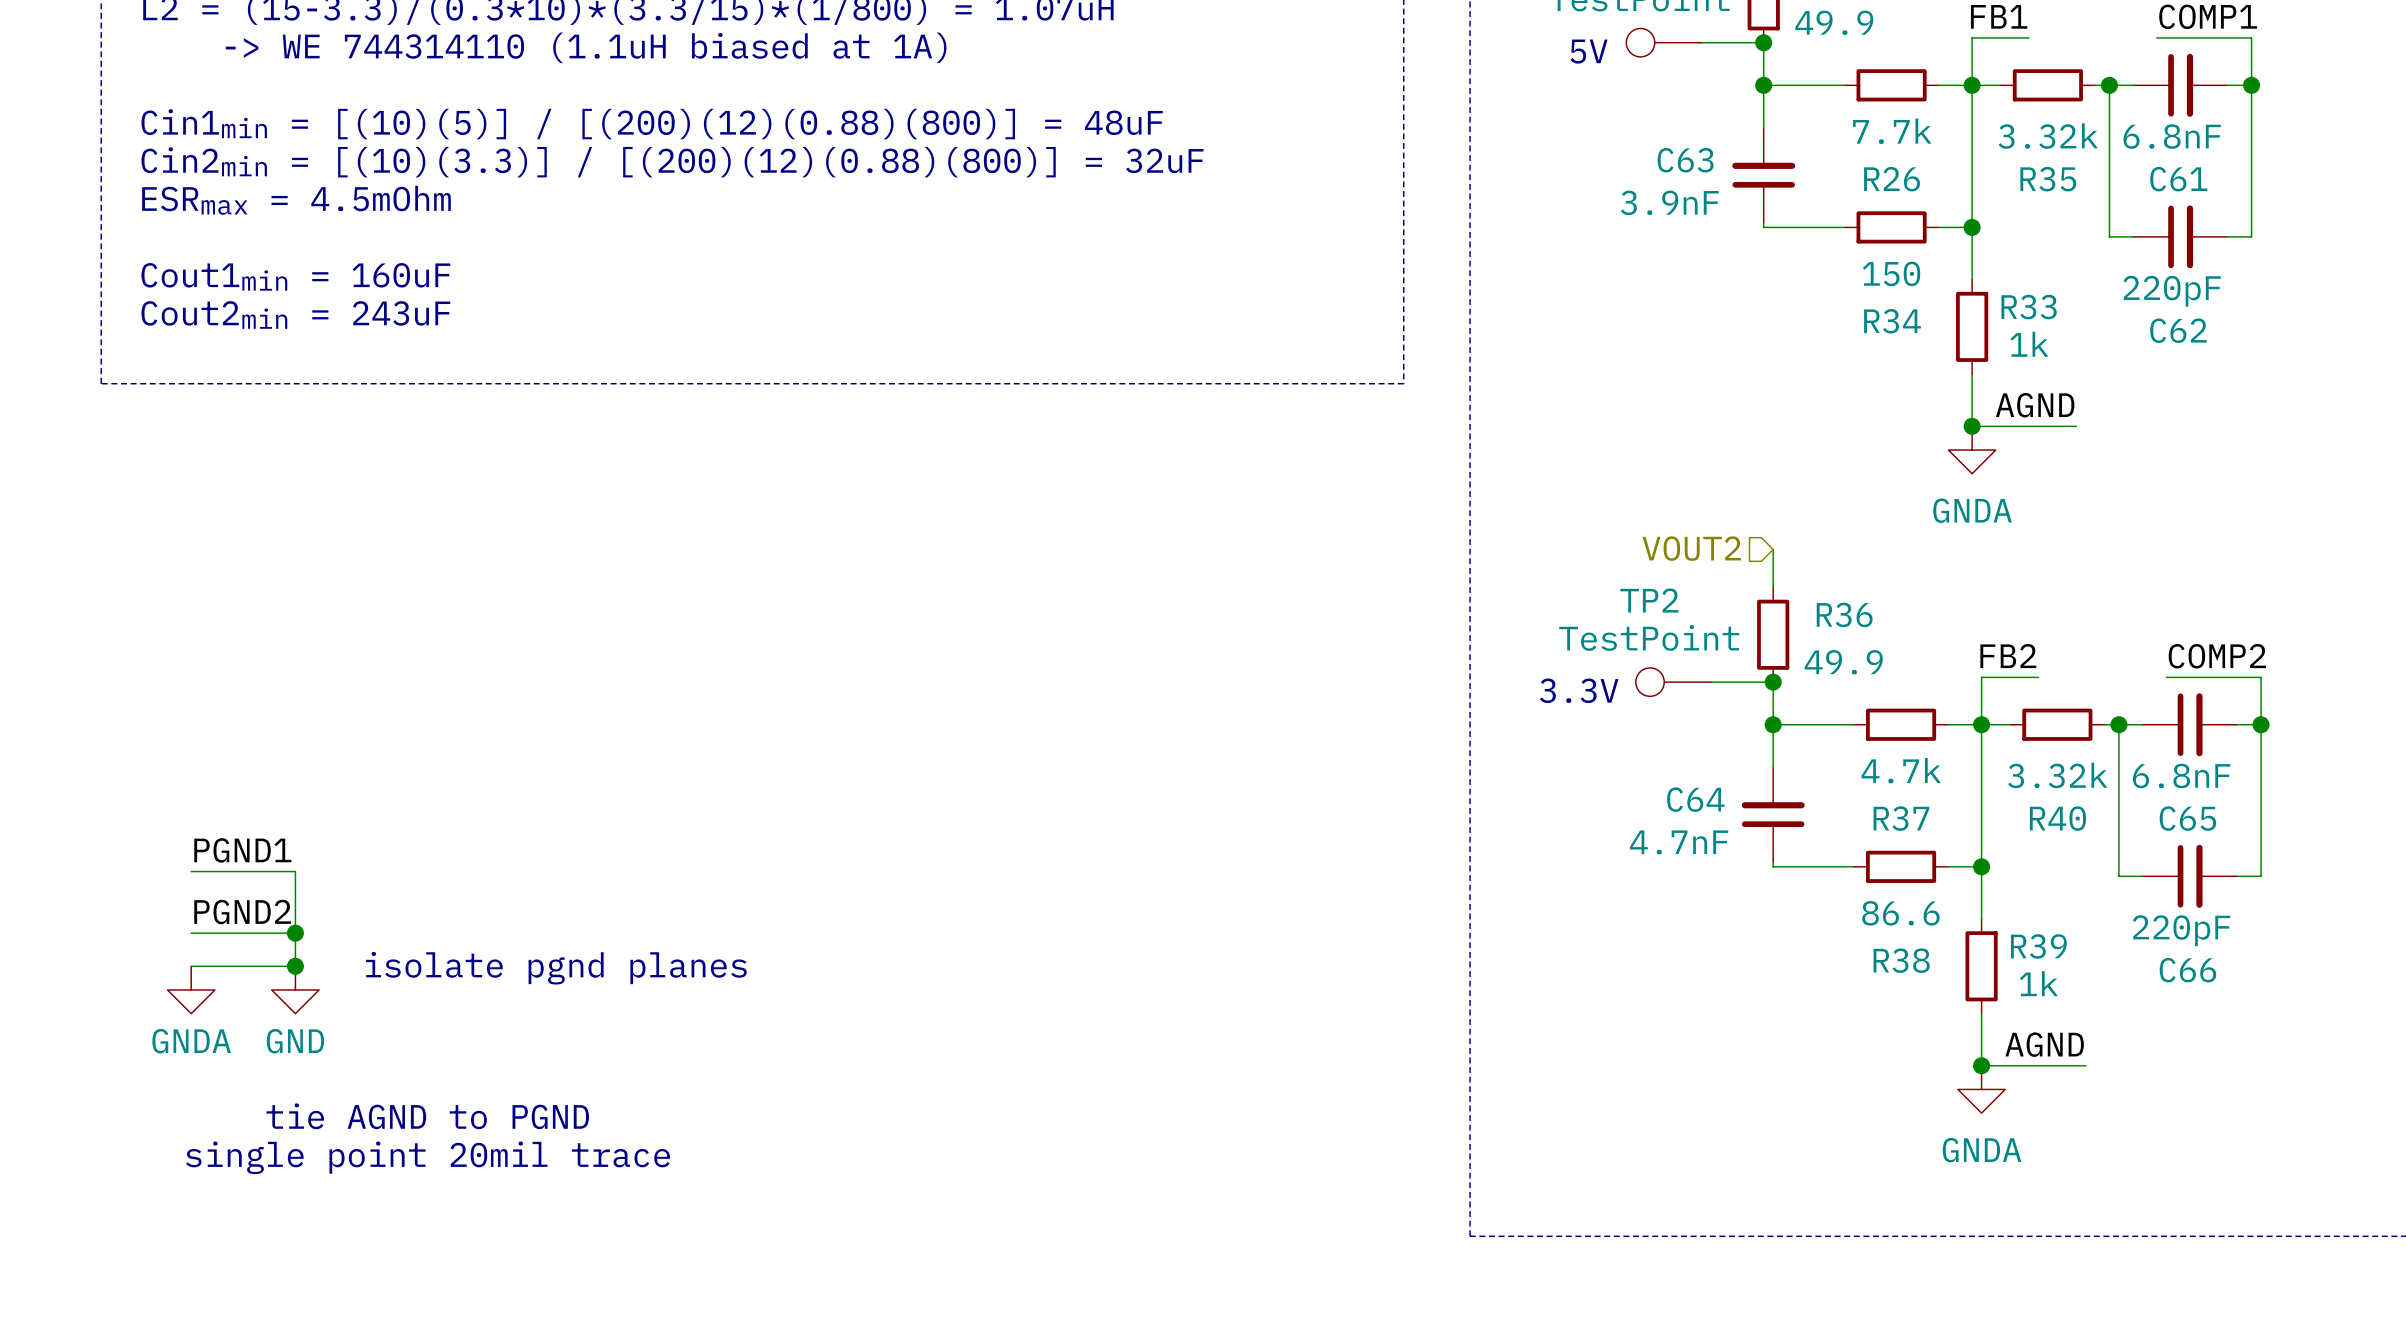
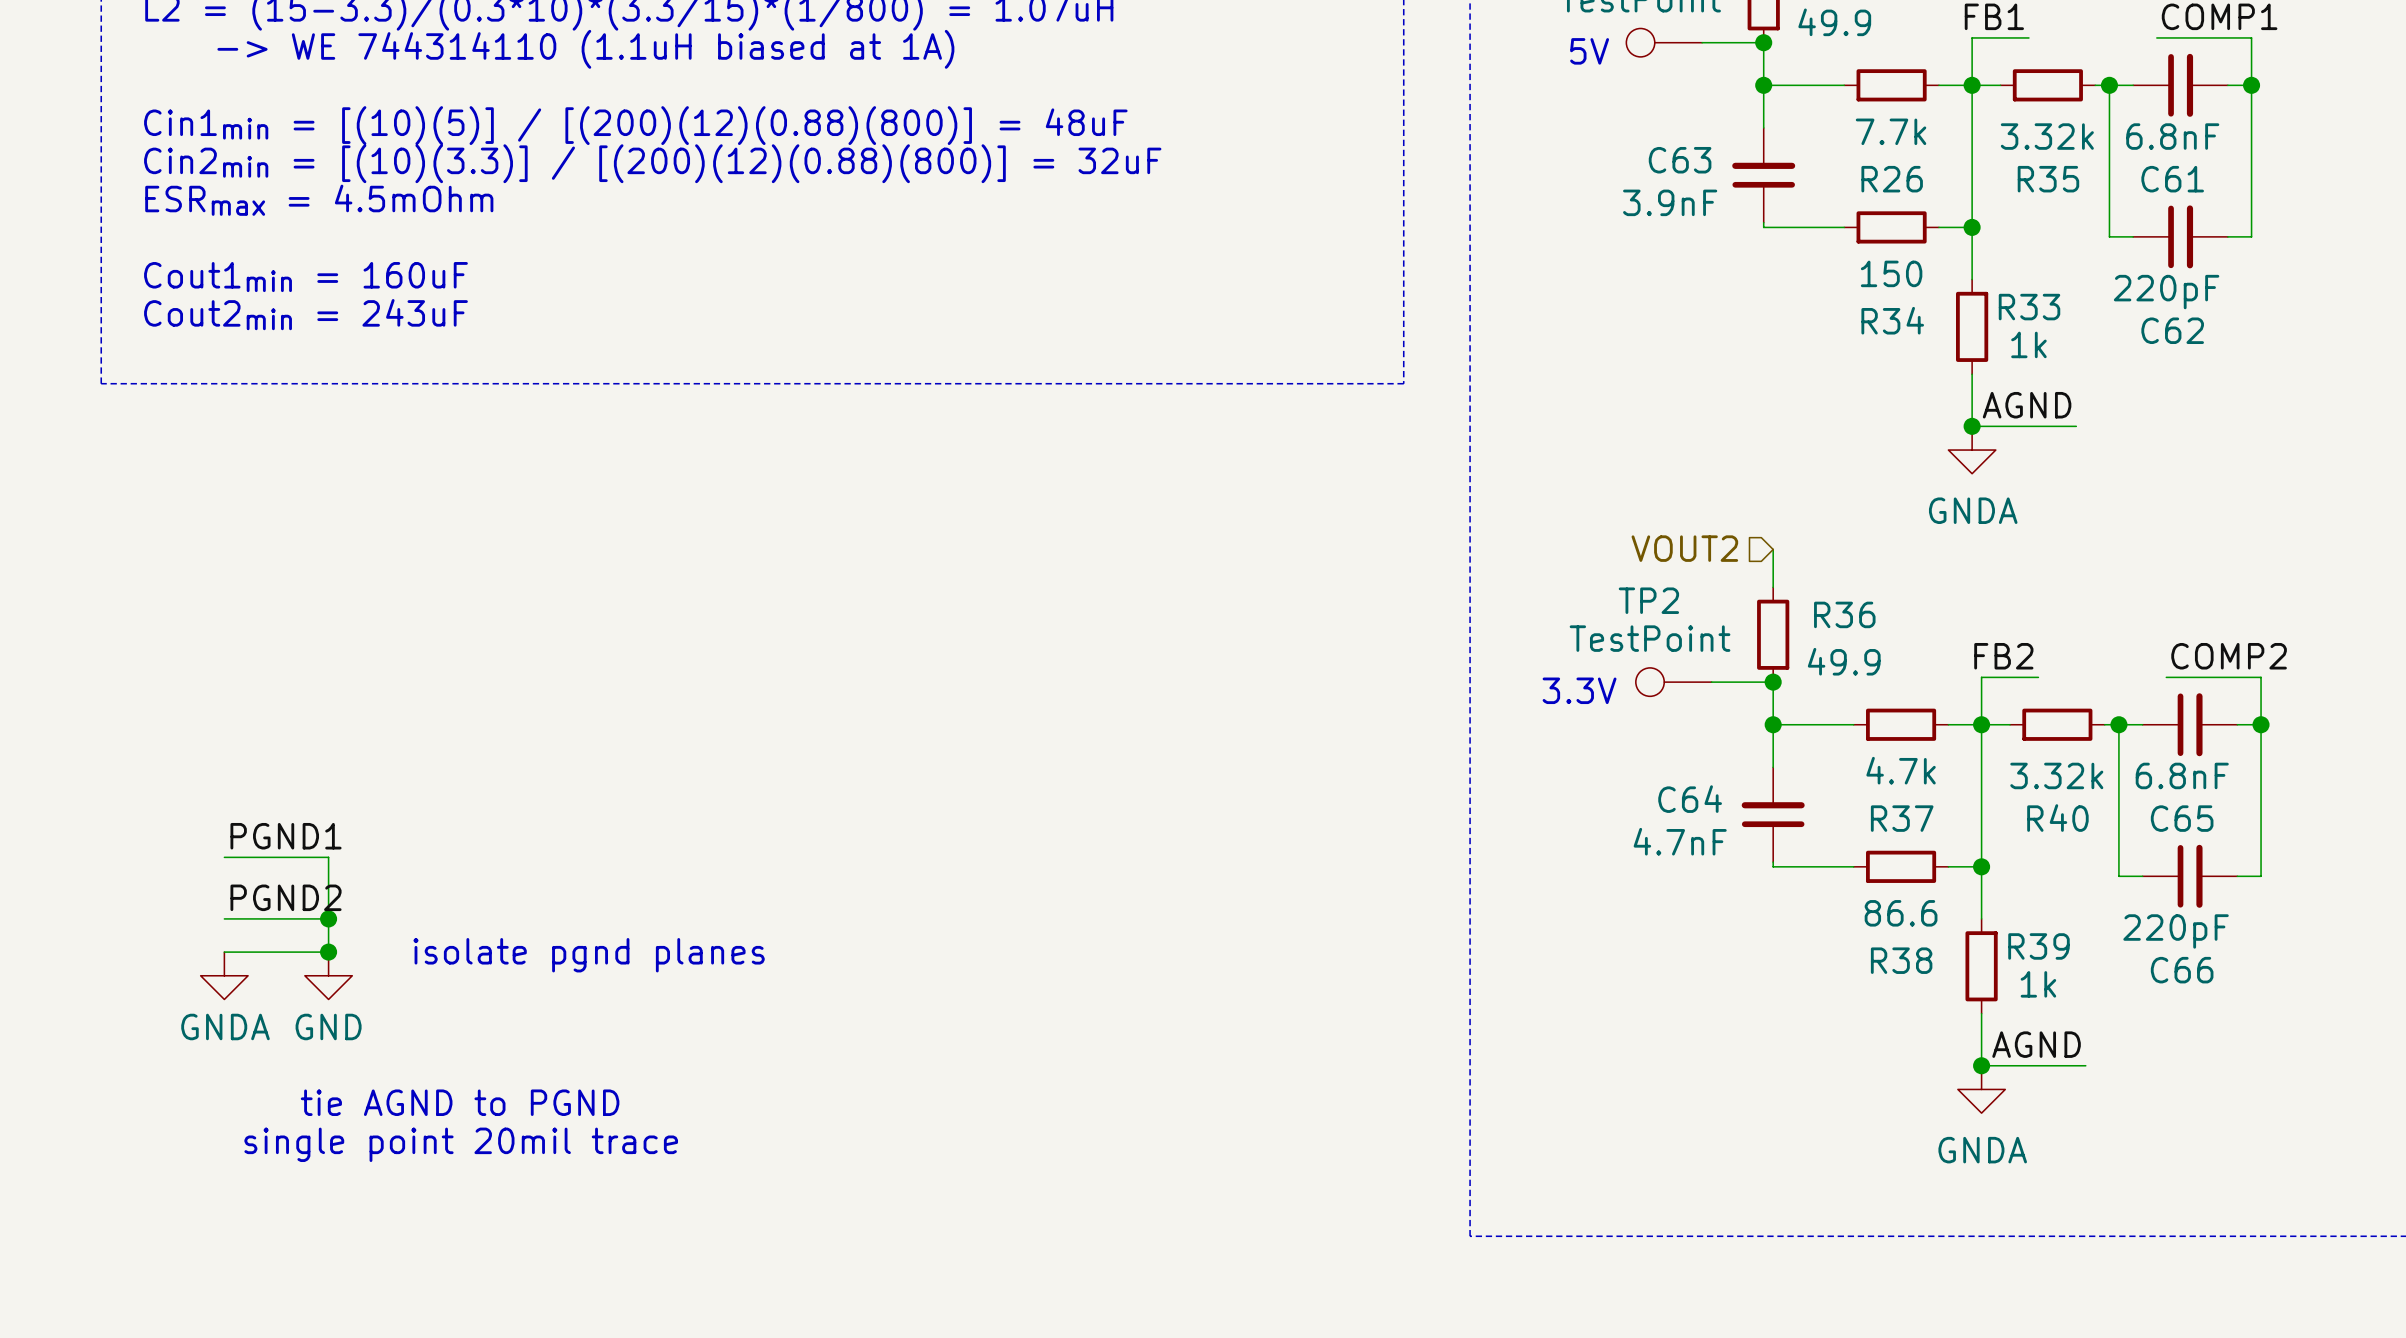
label position: PGND1 (242, 850) -> PGND1 (286, 836)
wire: (191, 871) (295, 871) (295, 966) (191, 966) -> (224, 857) (328, 857) (328, 952) (224, 952)
label position: PGND2 (242, 912) -> PGND2 (286, 897)
junction: none -> (328, 918)
wire: (191, 933) (295, 933) -> (224, 918) (328, 918)
junction: (295, 933) -> none
junction: none -> (328, 952)
junction: (295, 966) -> none
text position: isolate pgnd planes (556, 968) -> isolate pgnd planes (589, 955)
power symbol position: GNDA (191, 989) -> GNDA (224, 975)
power symbol position: GND (295, 989) -> GND (328, 975)
text position: tie AGND to PGND (427, 1116) -> tie AGND to PGND (460, 1102)
text position: single point 20mil trace (428, 1157) -> single point 20mil trace (461, 1144)

